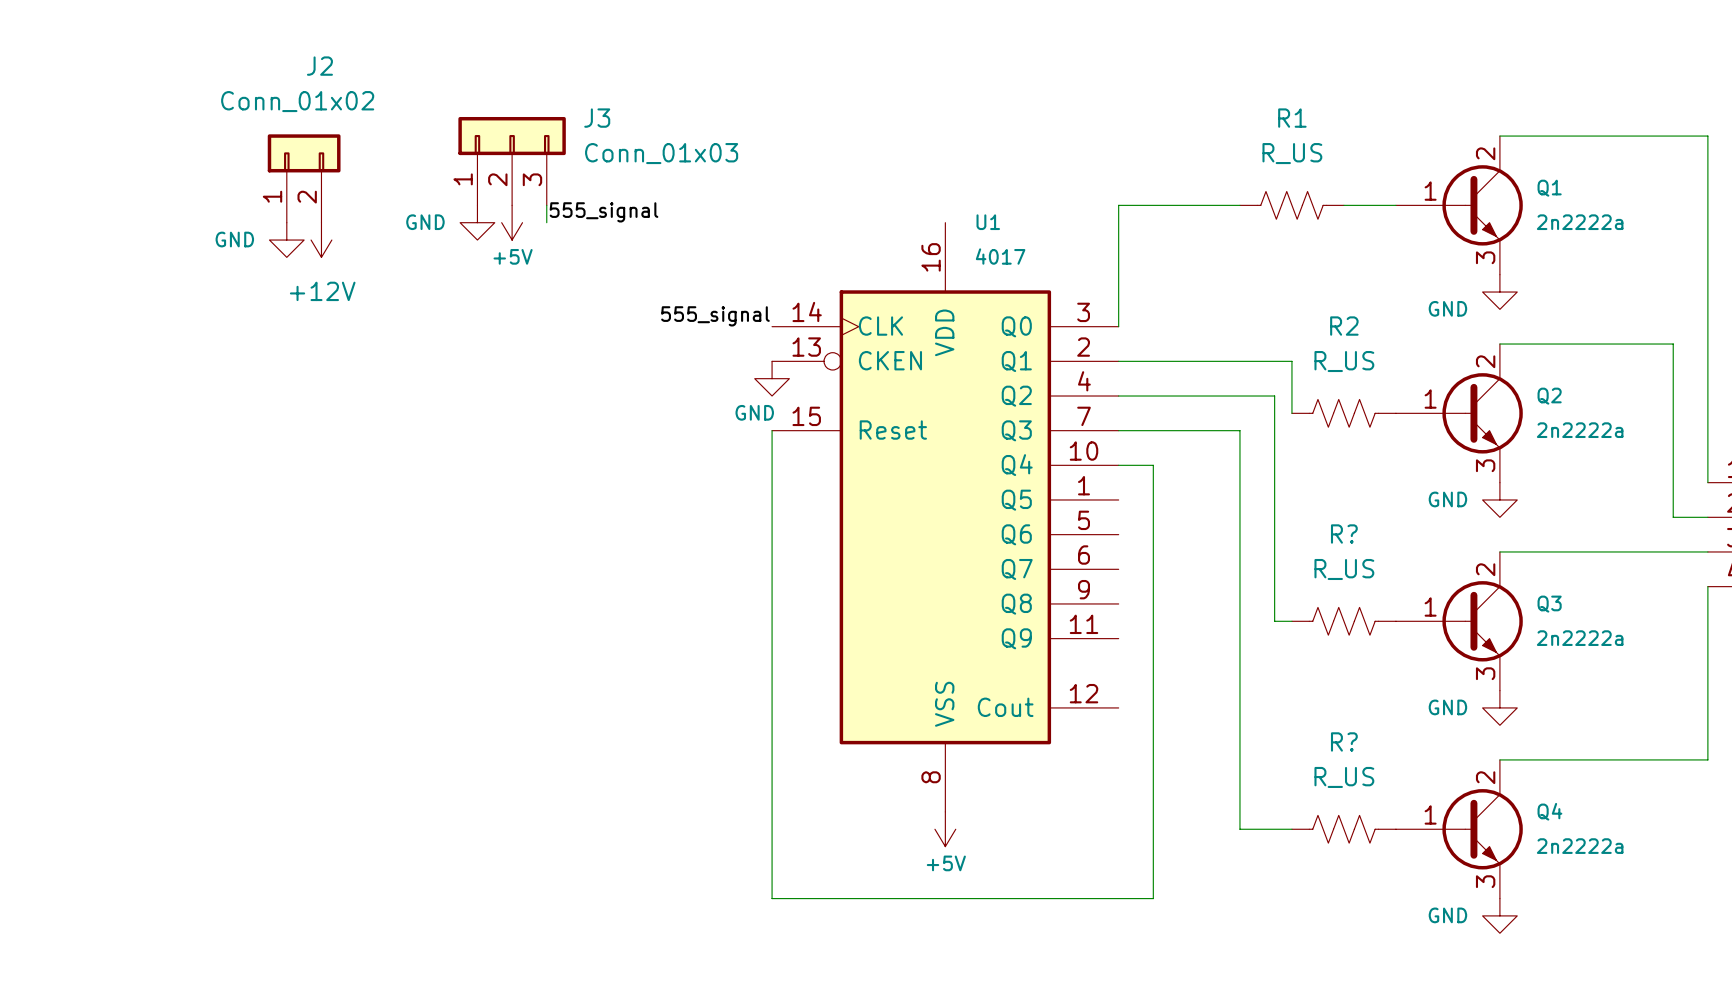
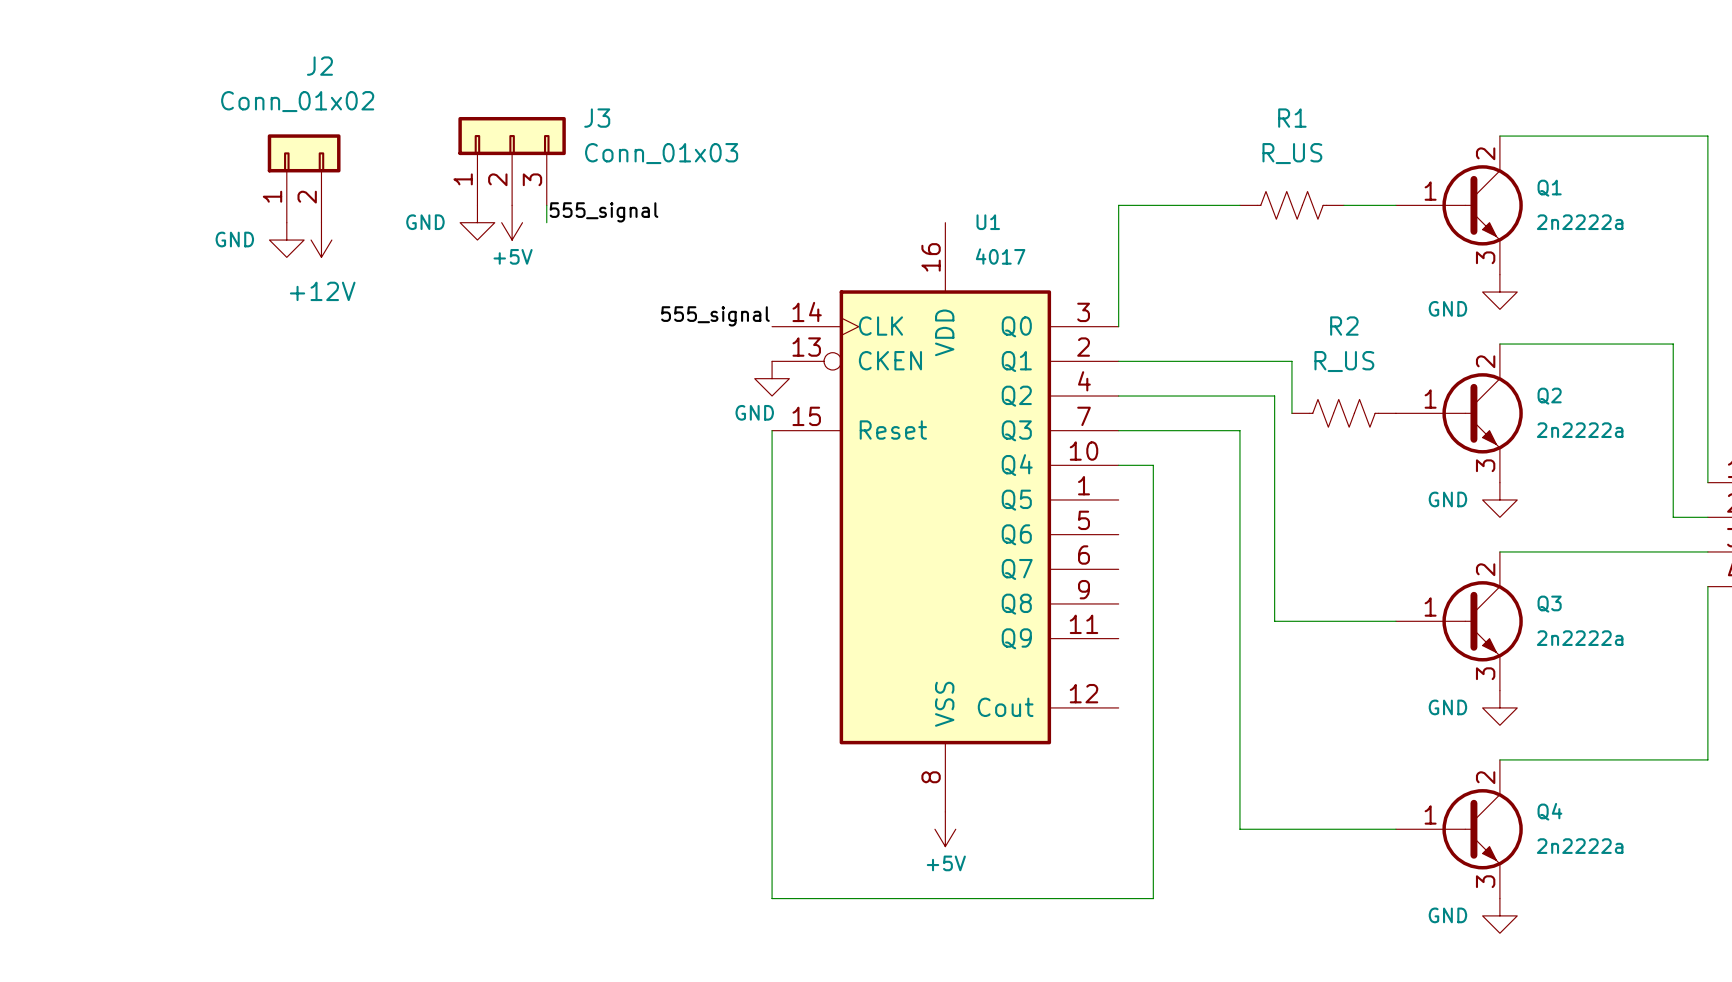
wire: none -> (1291, 621) (1395, 621)
R?: R_US (1343, 621) -> none
wire: none -> (1291, 829) (1395, 829)
R?: R_US (1343, 829) -> none

